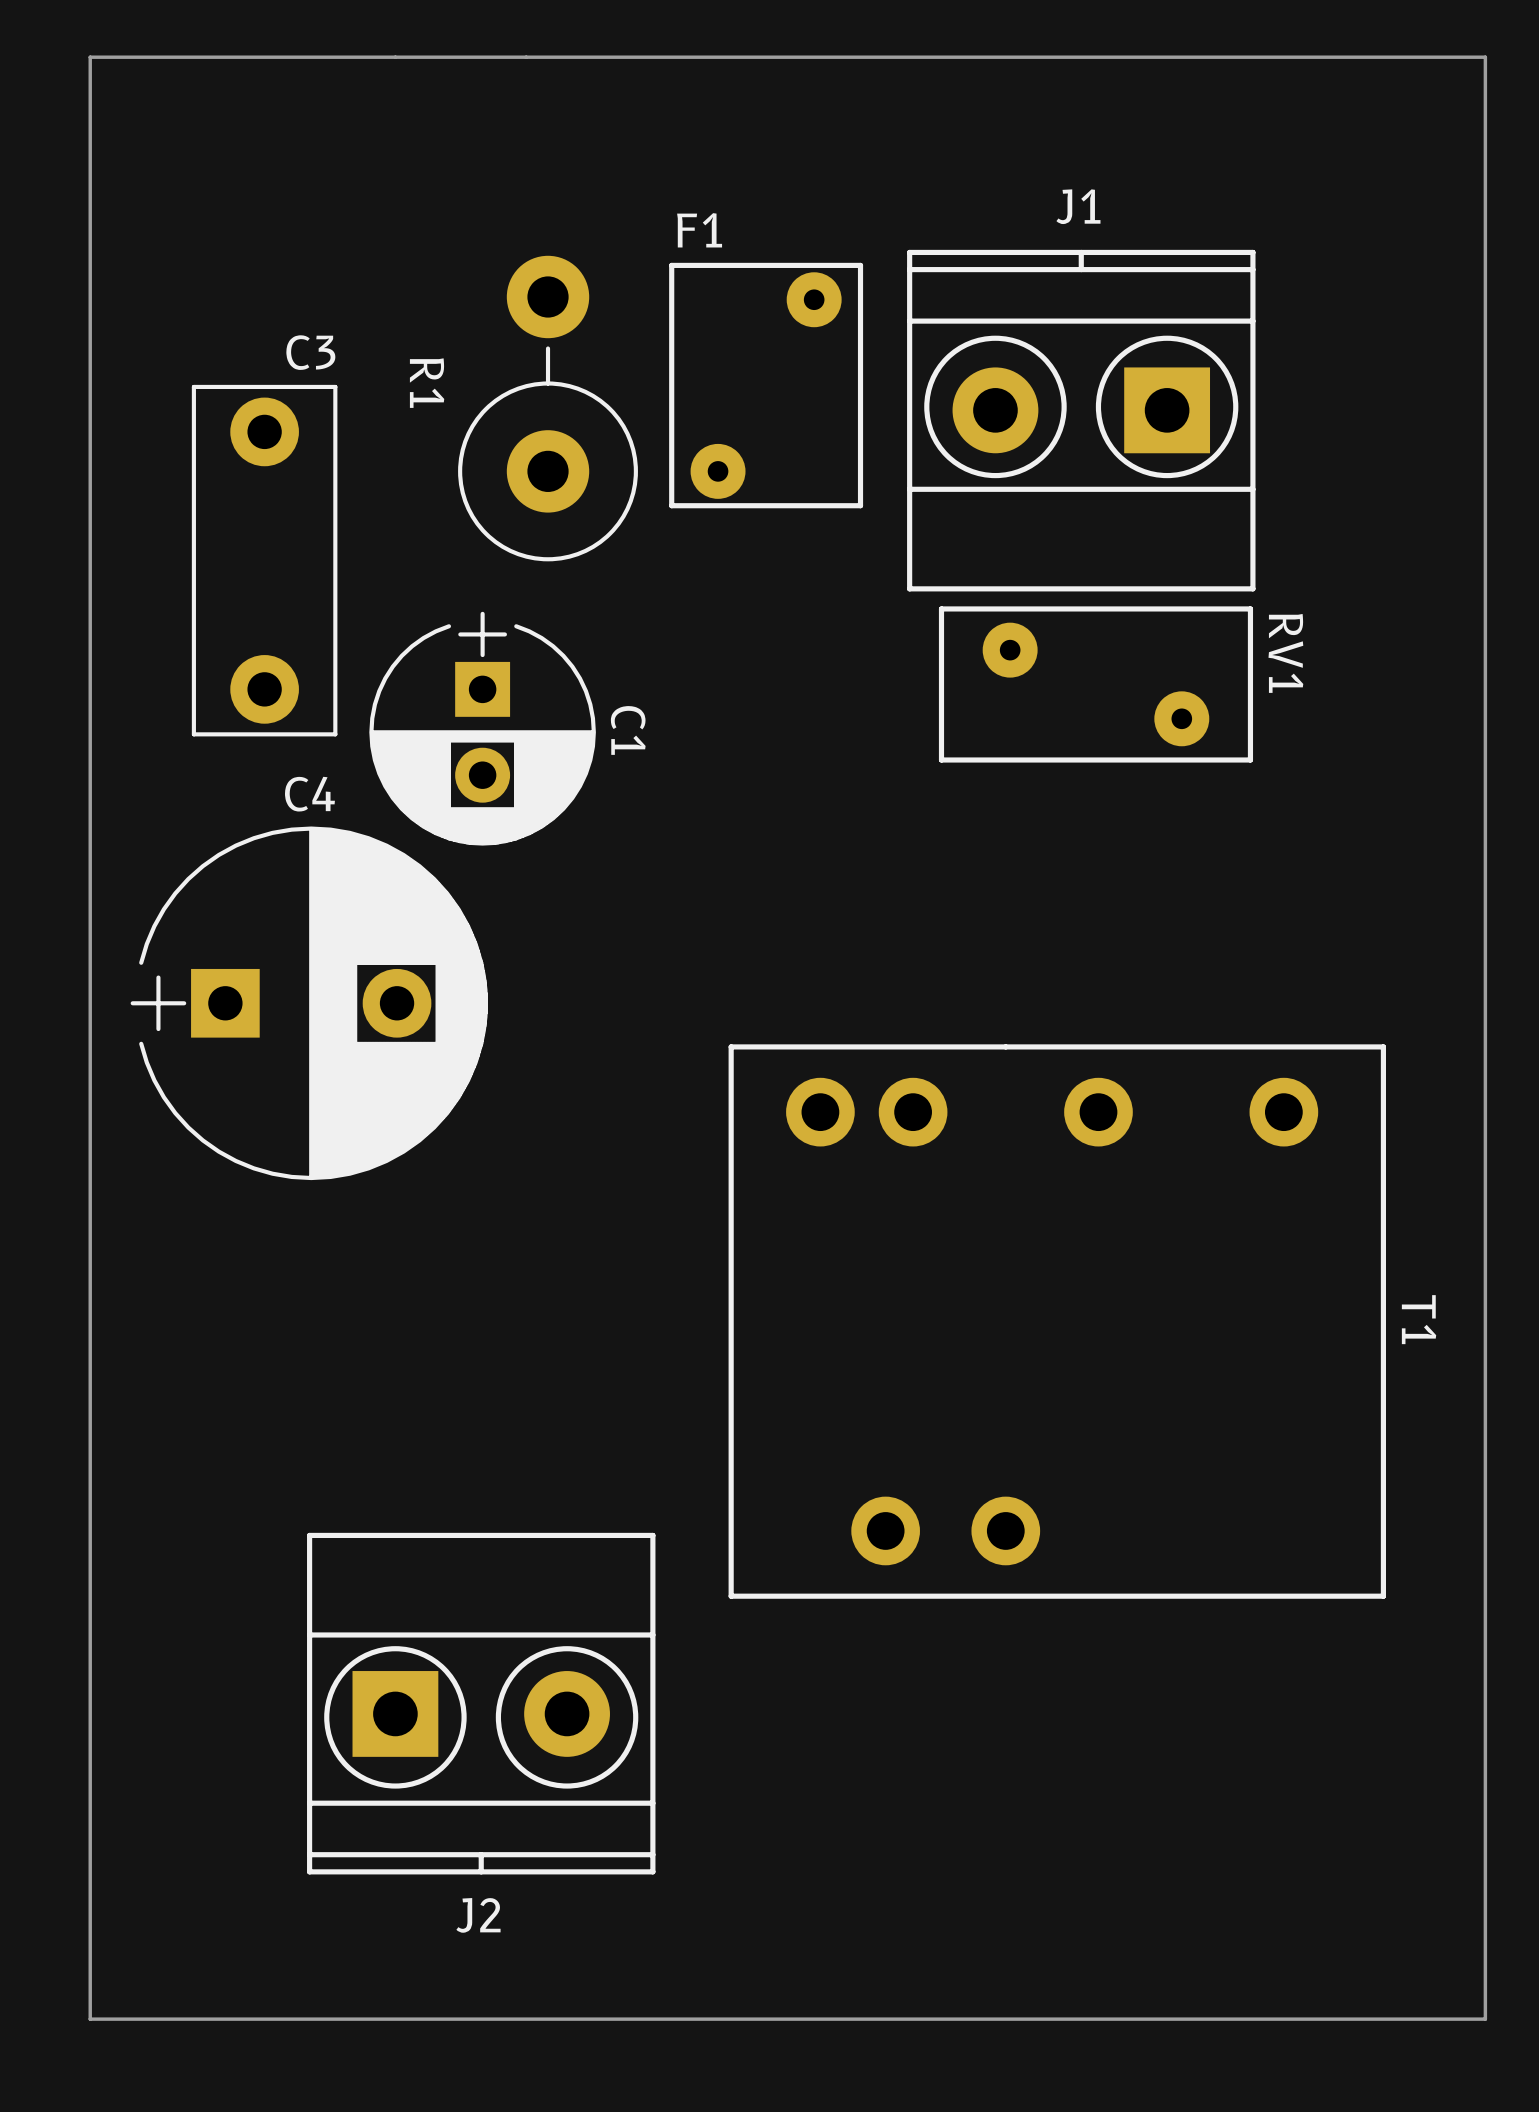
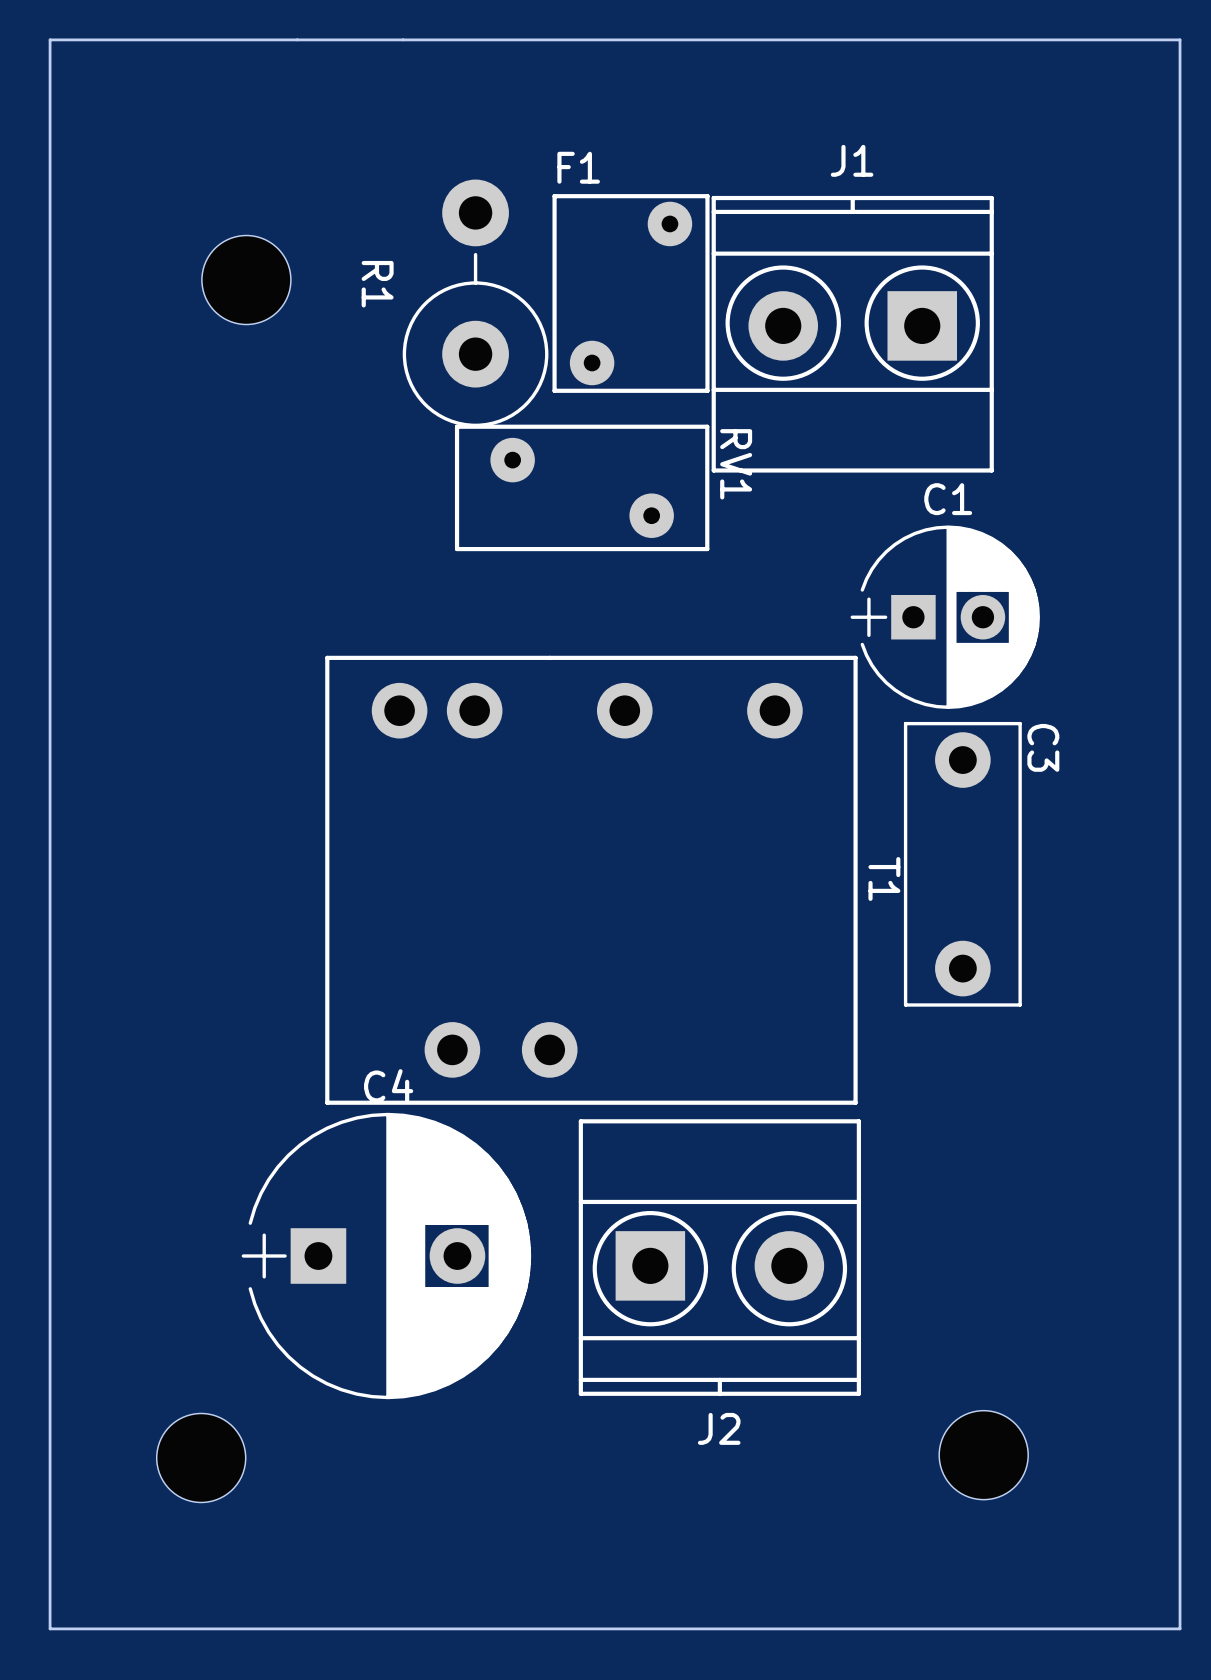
C3 name rotation: 0° (310, 352) -> 90° clockwise (1043, 747)
part: none -> (246, 280)
F1 position: (766, 385) -> (631, 293)
R1 position: (548, 408) -> (475, 303)
C3 position: (264, 560) -> (962, 864)
RV1 position: (1095, 684) -> (582, 487)
C1 rotation: 0° (482, 728) -> 90° counterclockwise (945, 617)
C1 position: (482, 728) -> (945, 617)
C4 position: (309, 1003) -> (386, 1256)
T1 position: (1057, 1321) -> (591, 880)
J2 position: (481, 1703) -> (719, 1257)
part: none -> (983, 1455)
part: none -> (201, 1457)

